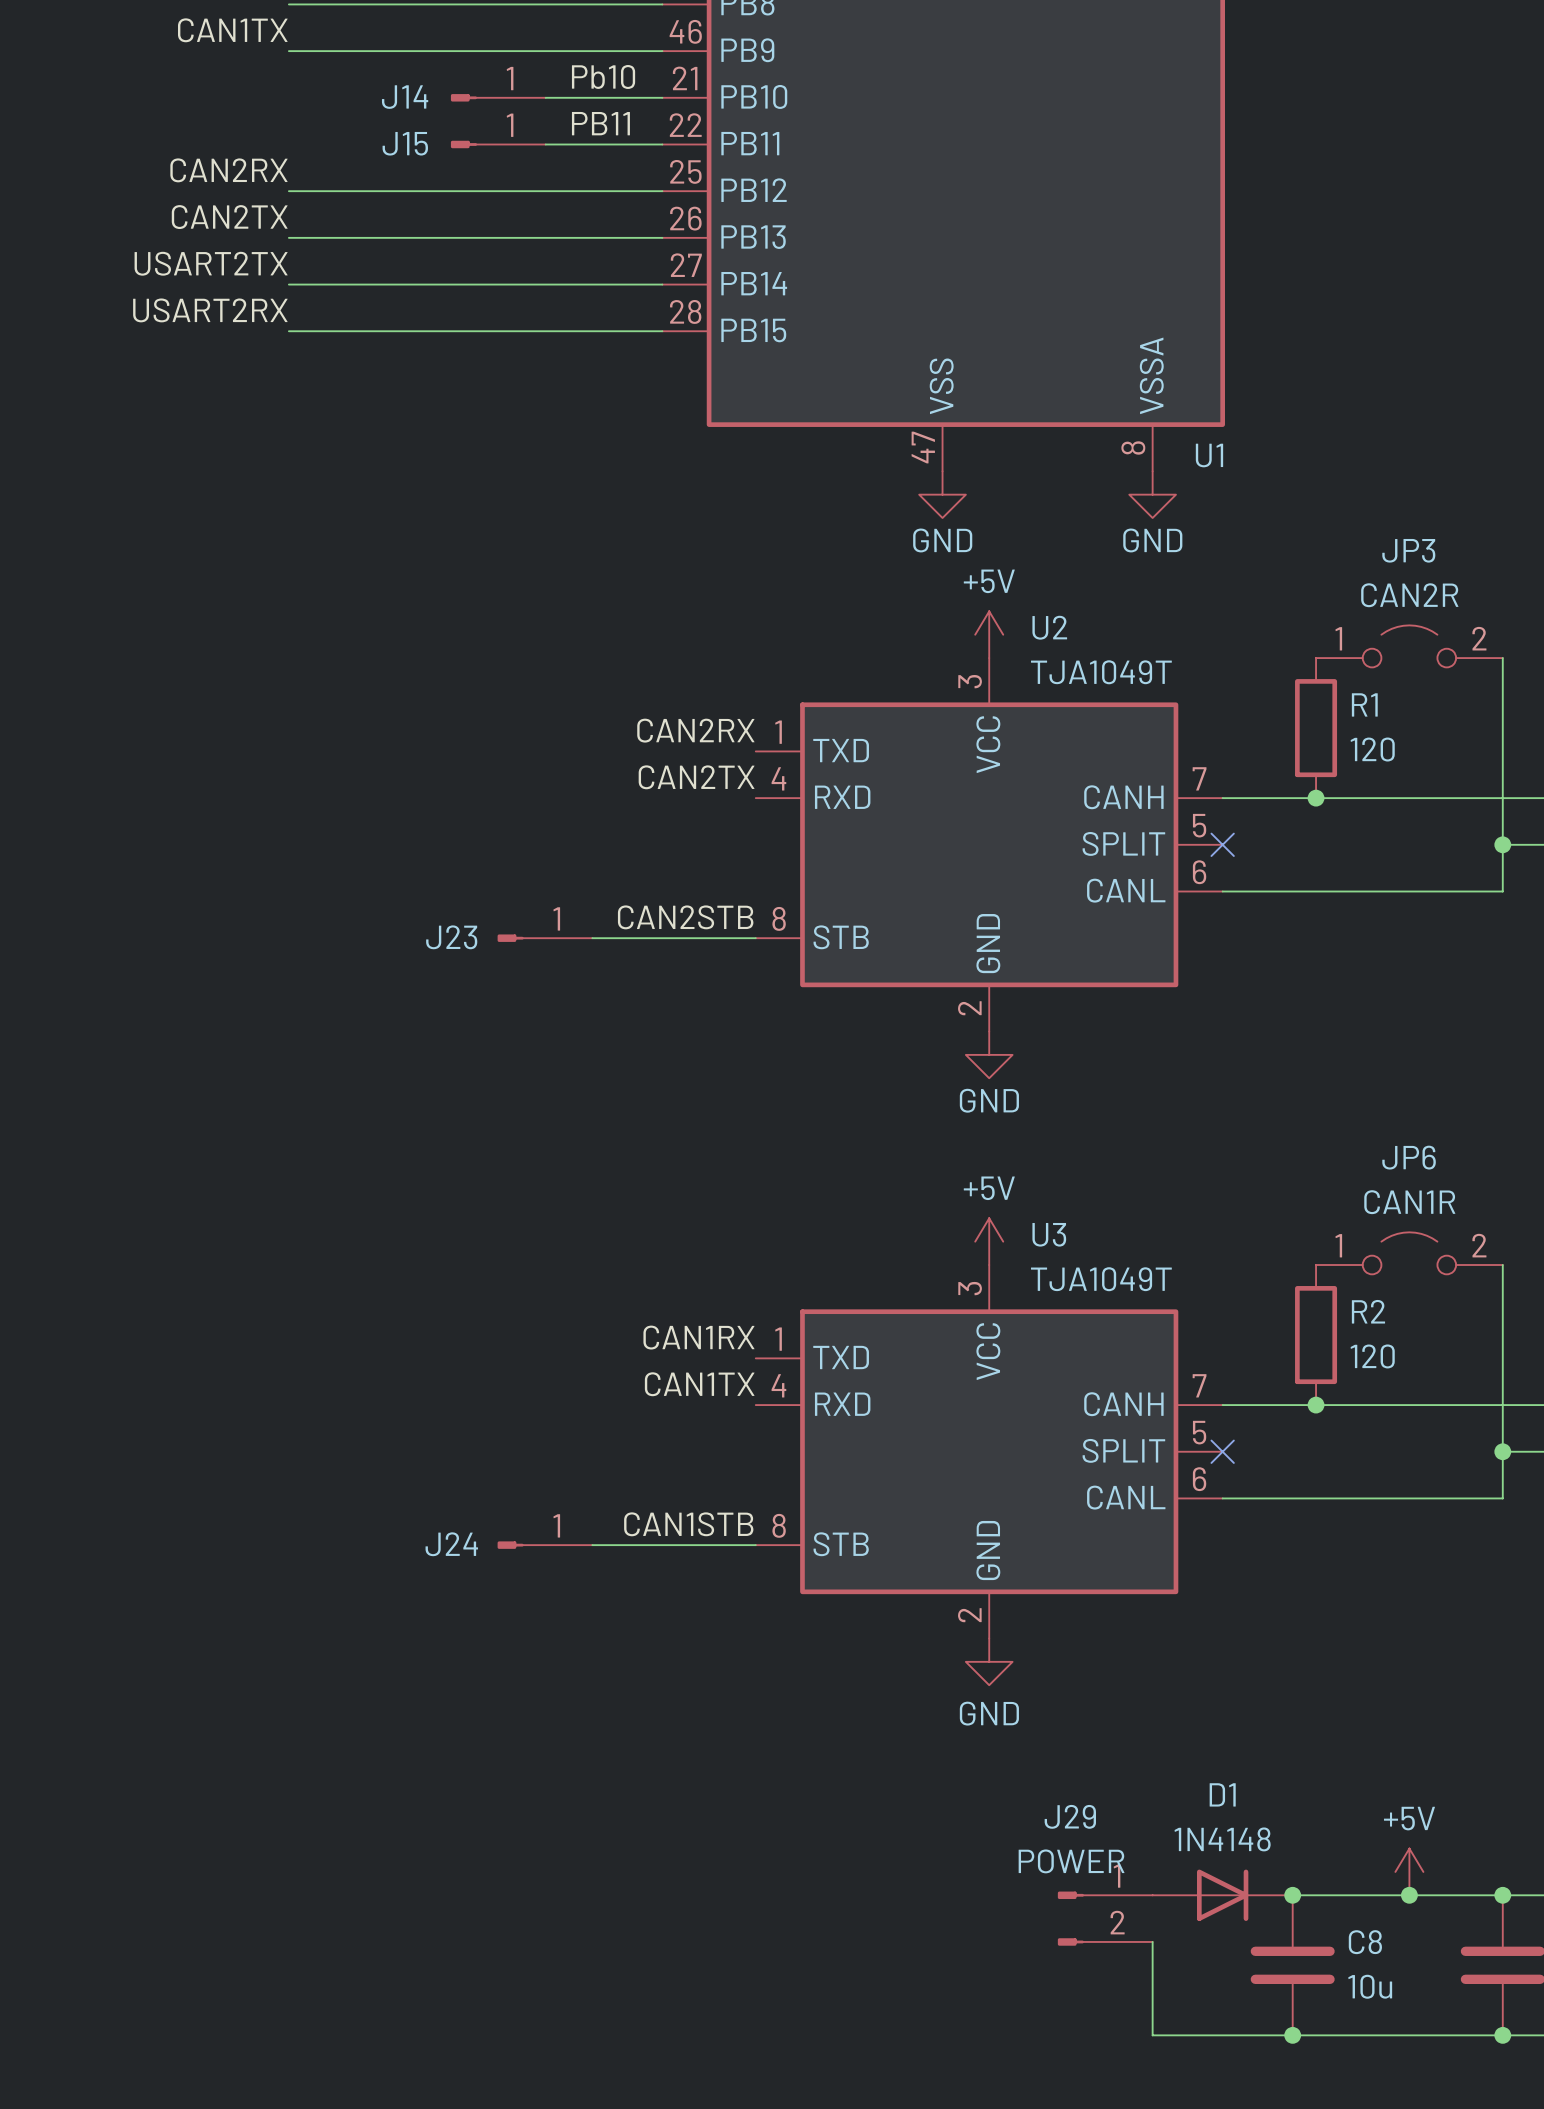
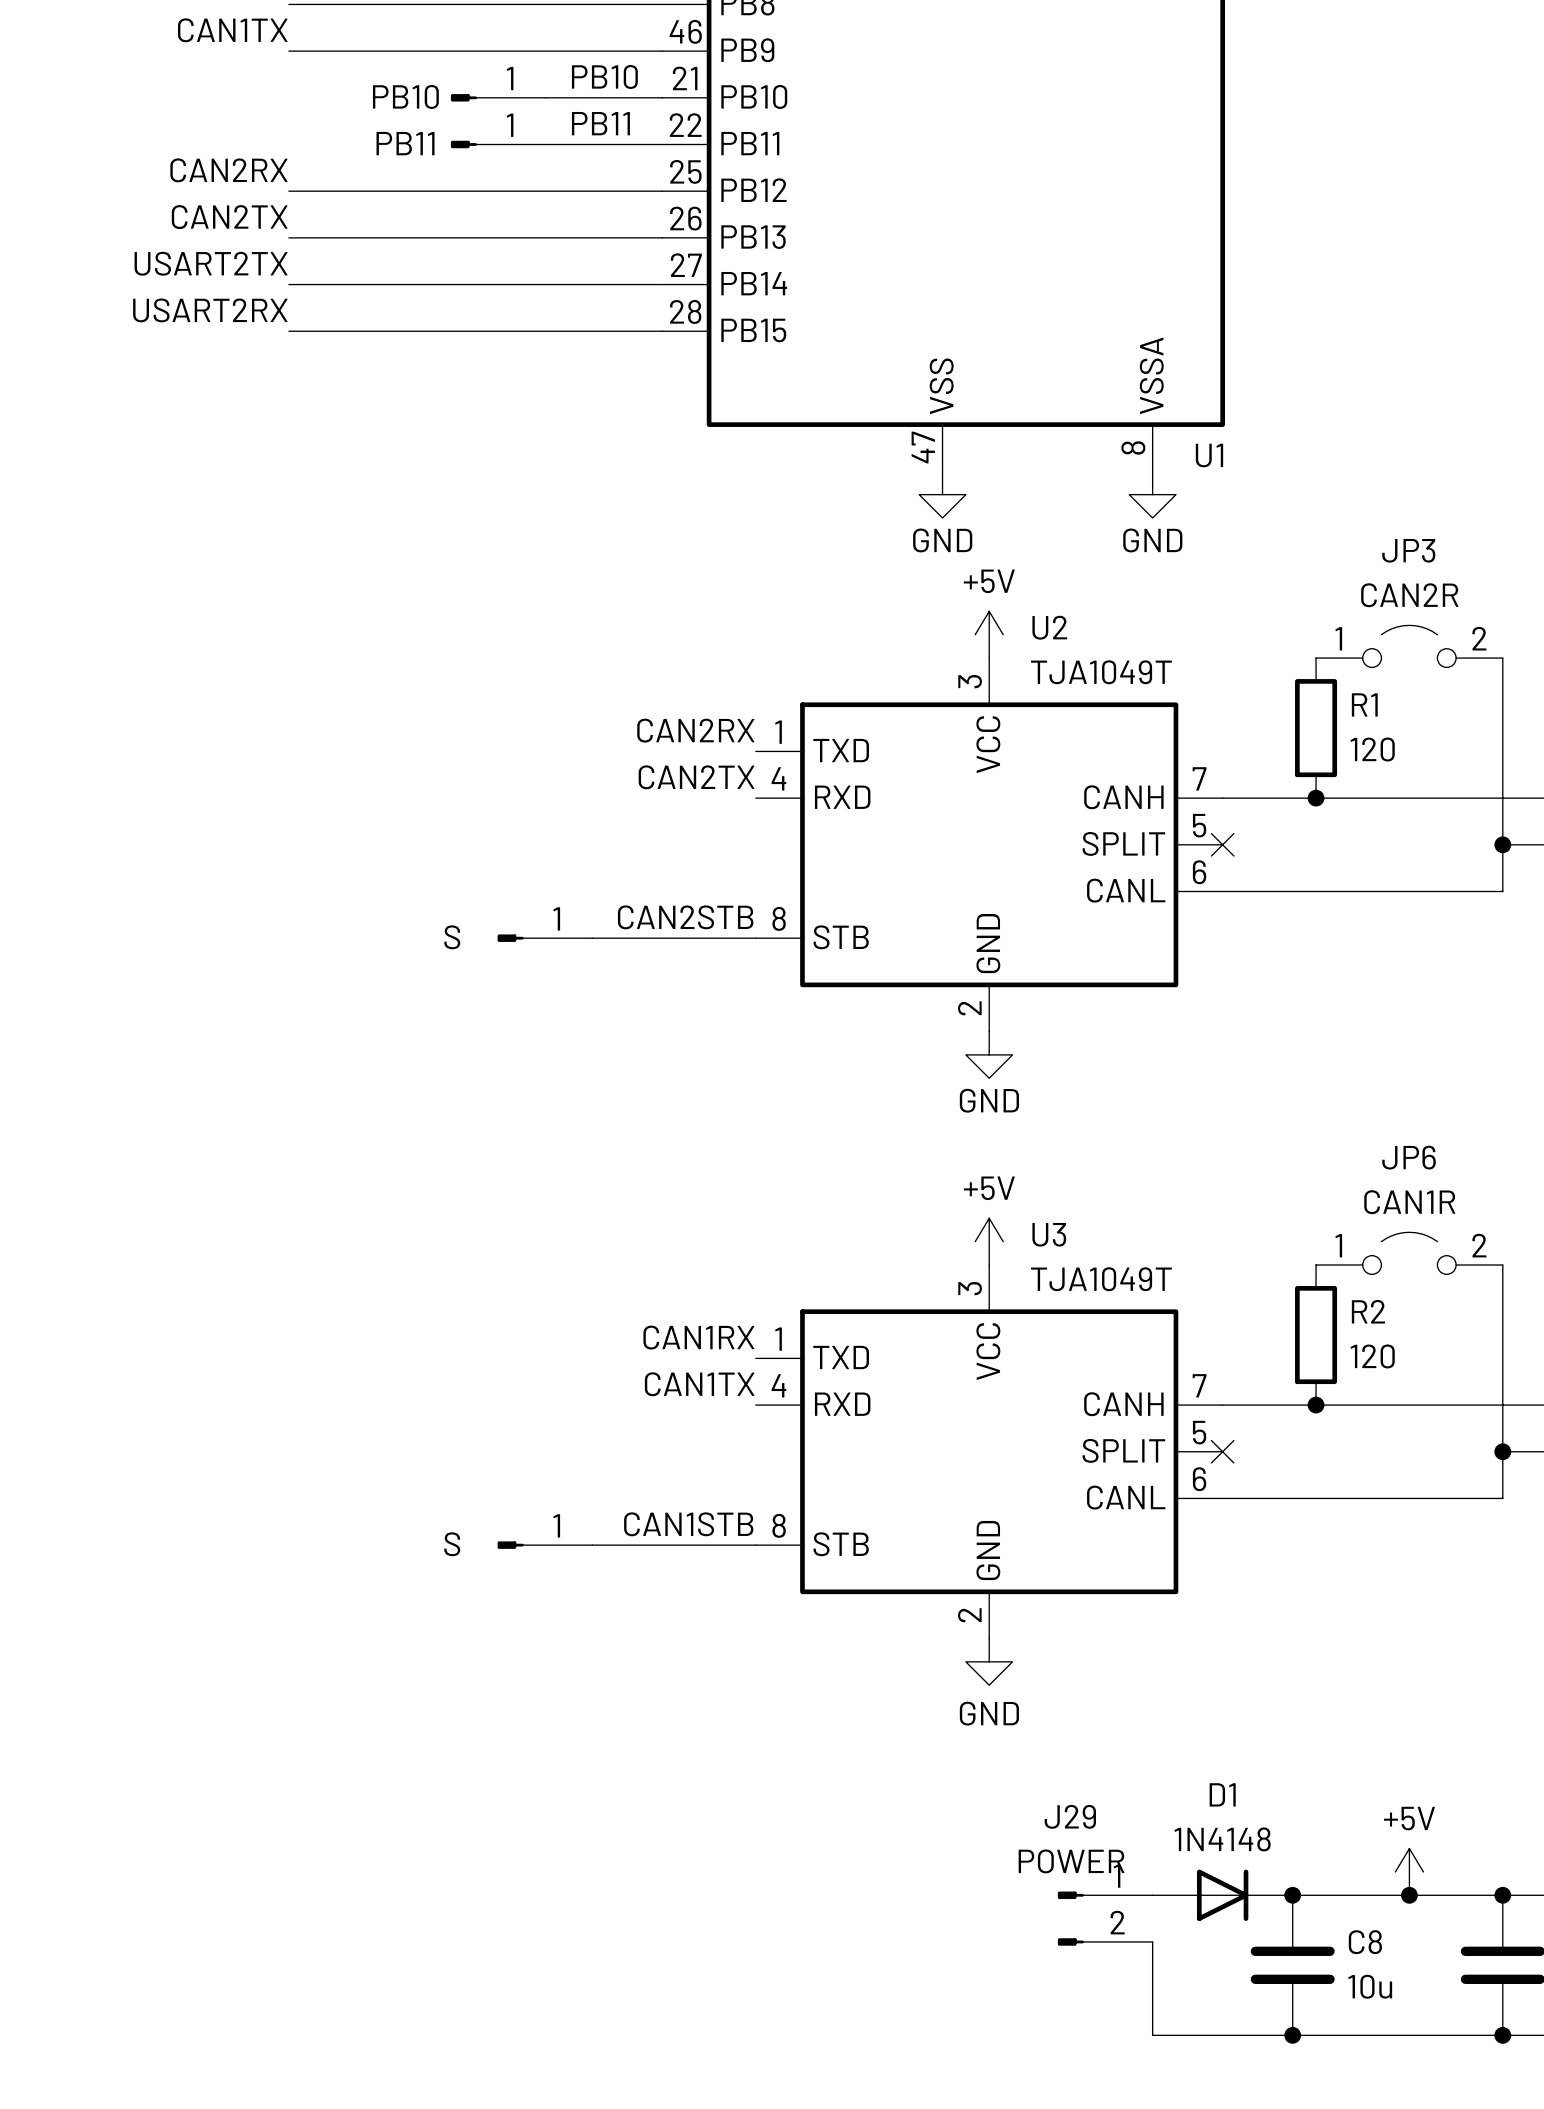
label: Pb10 (603, 76) -> PB10 (604, 76)
J14 name: J14 (405, 97) -> PB10 (405, 96)
J15 name: J15 (405, 143) -> PB11 (405, 143)
J23 name: J23 (451, 937) -> S (452, 937)
J24 name: J24 (451, 1544) -> S (452, 1544)

